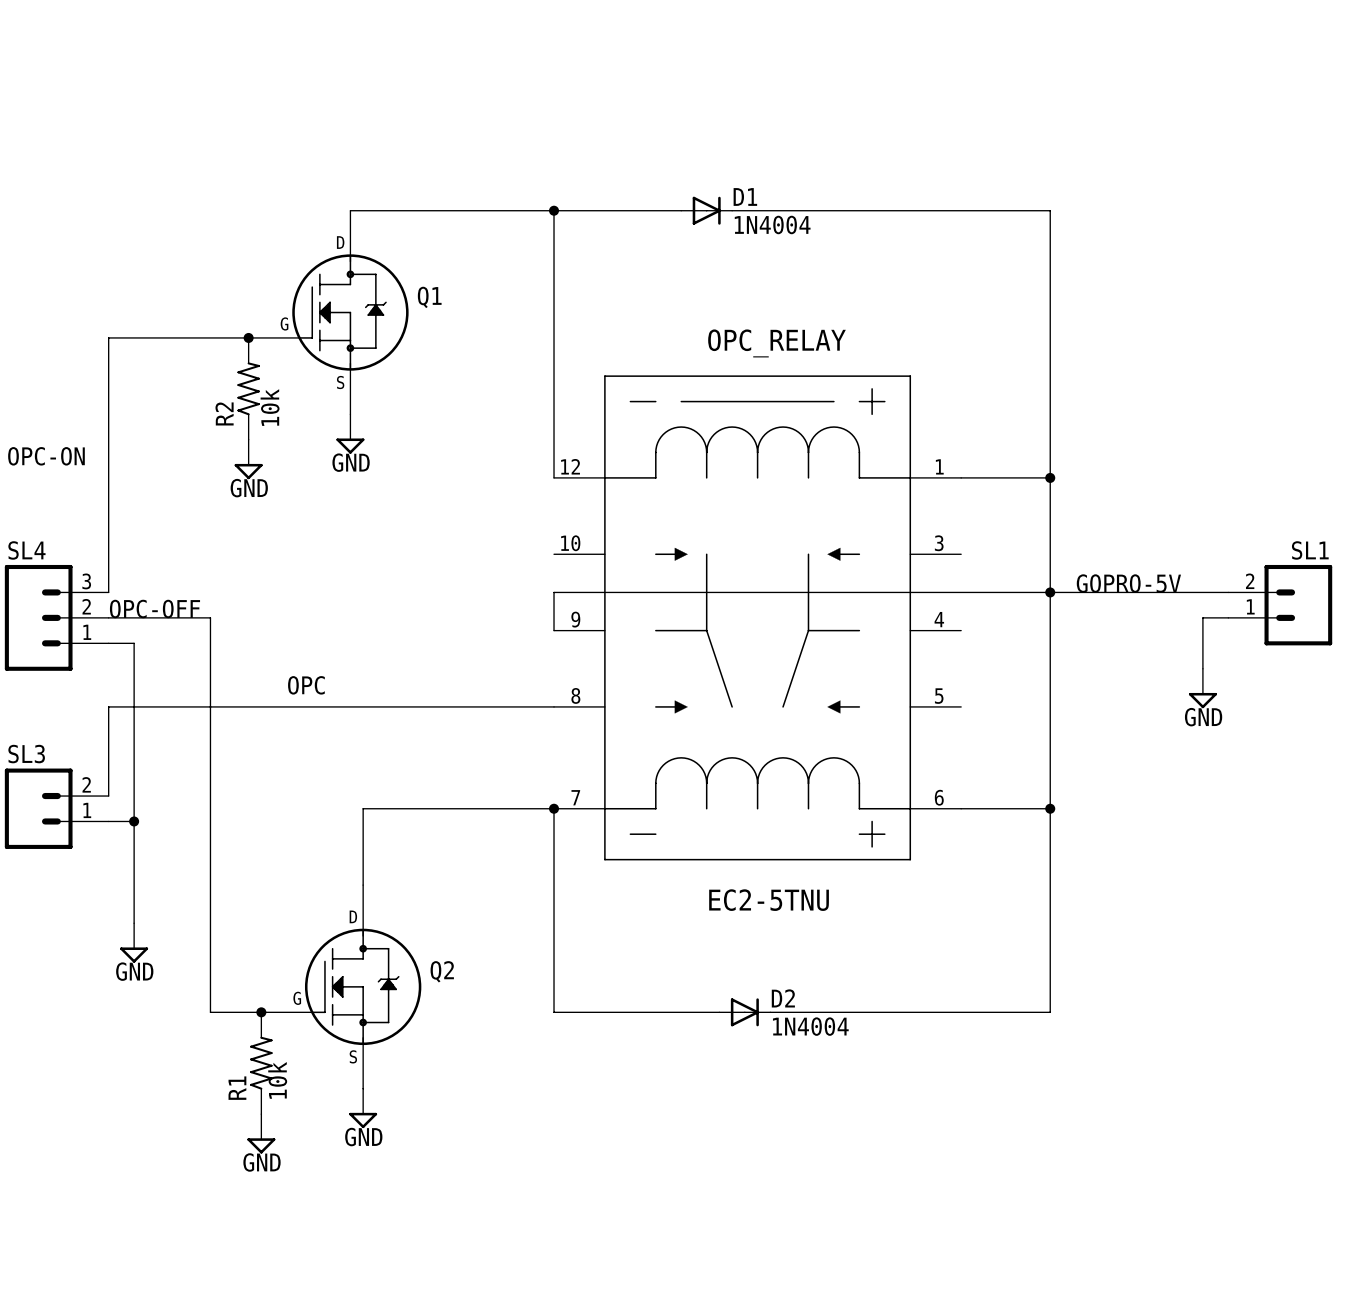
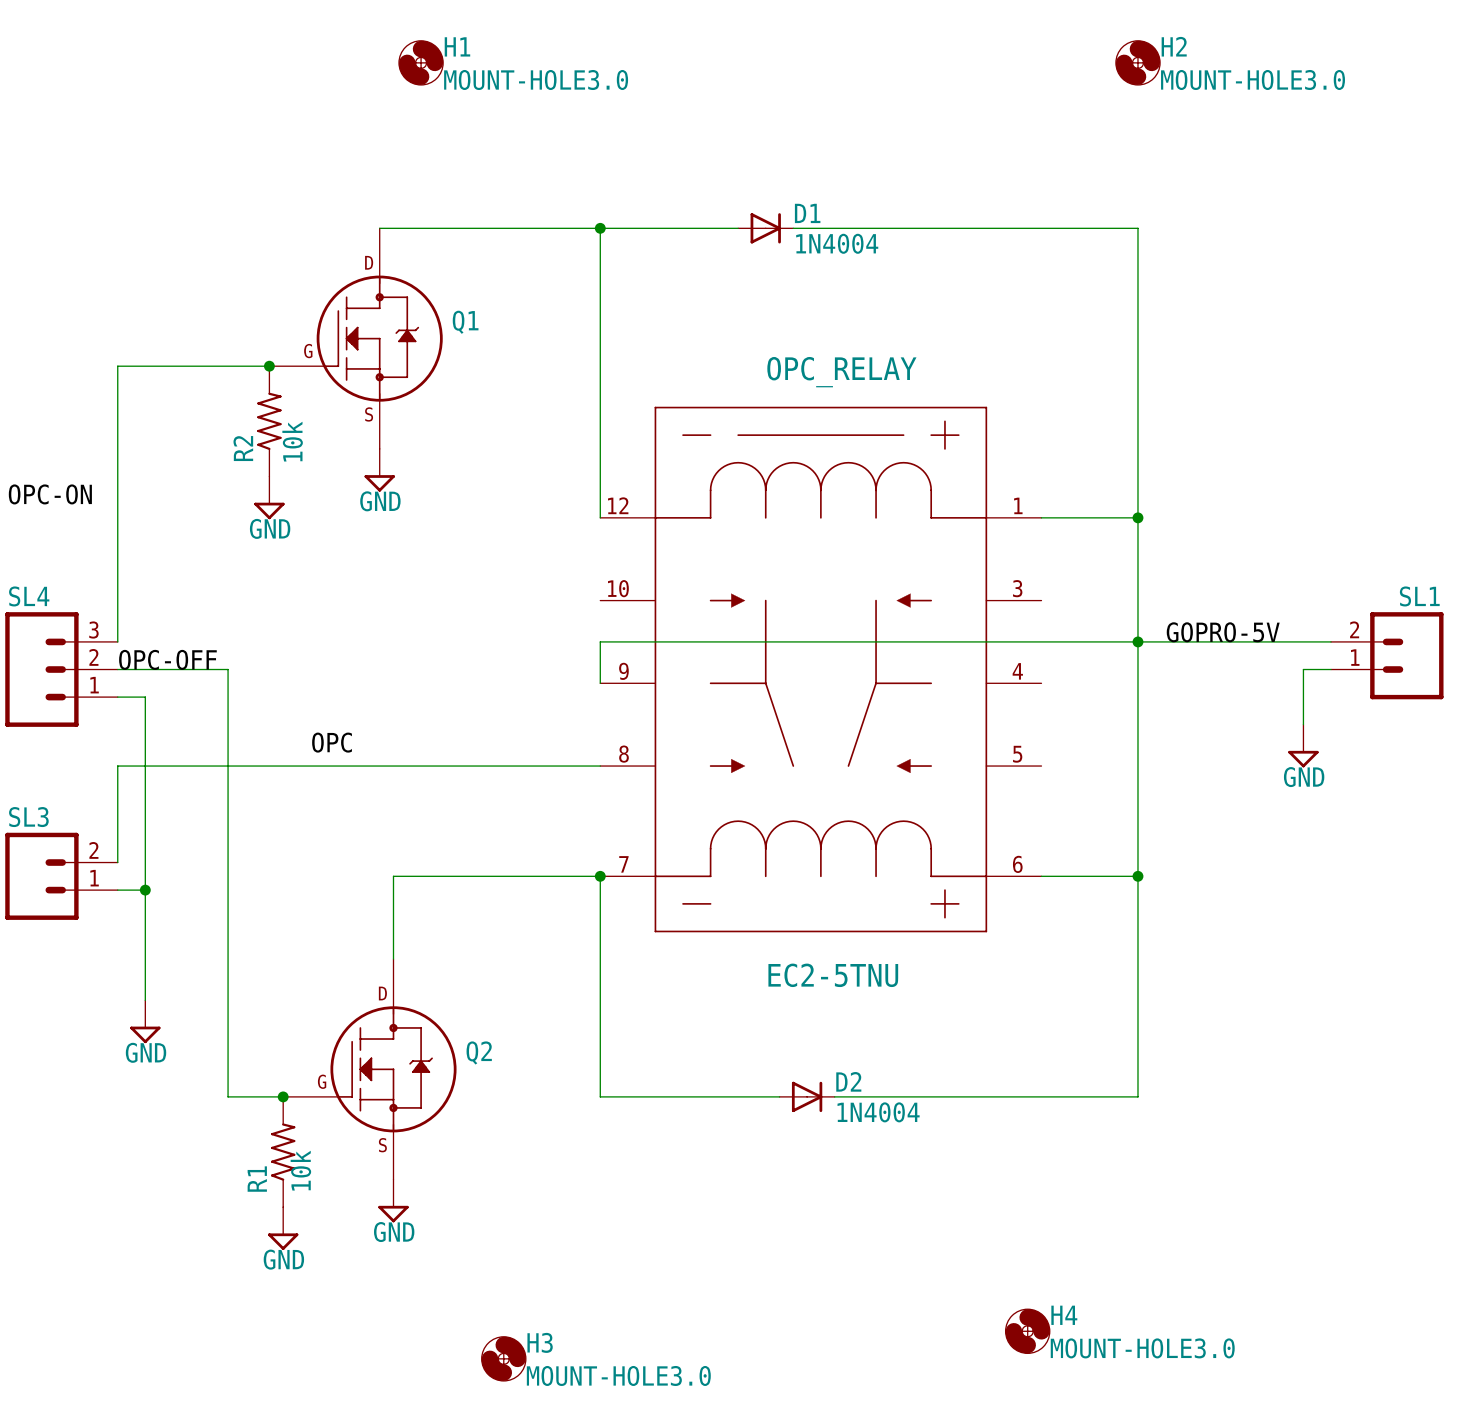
H1: none -> MOUNT-HOLE3.0 (421, 62)
H2: none -> MOUNT-HOLE3.0 (1137, 62)
H4: none -> MOUNT-HOLE3.0 (1027, 1331)
H3: none -> MOUNT-HOLE3.0 (503, 1358)

